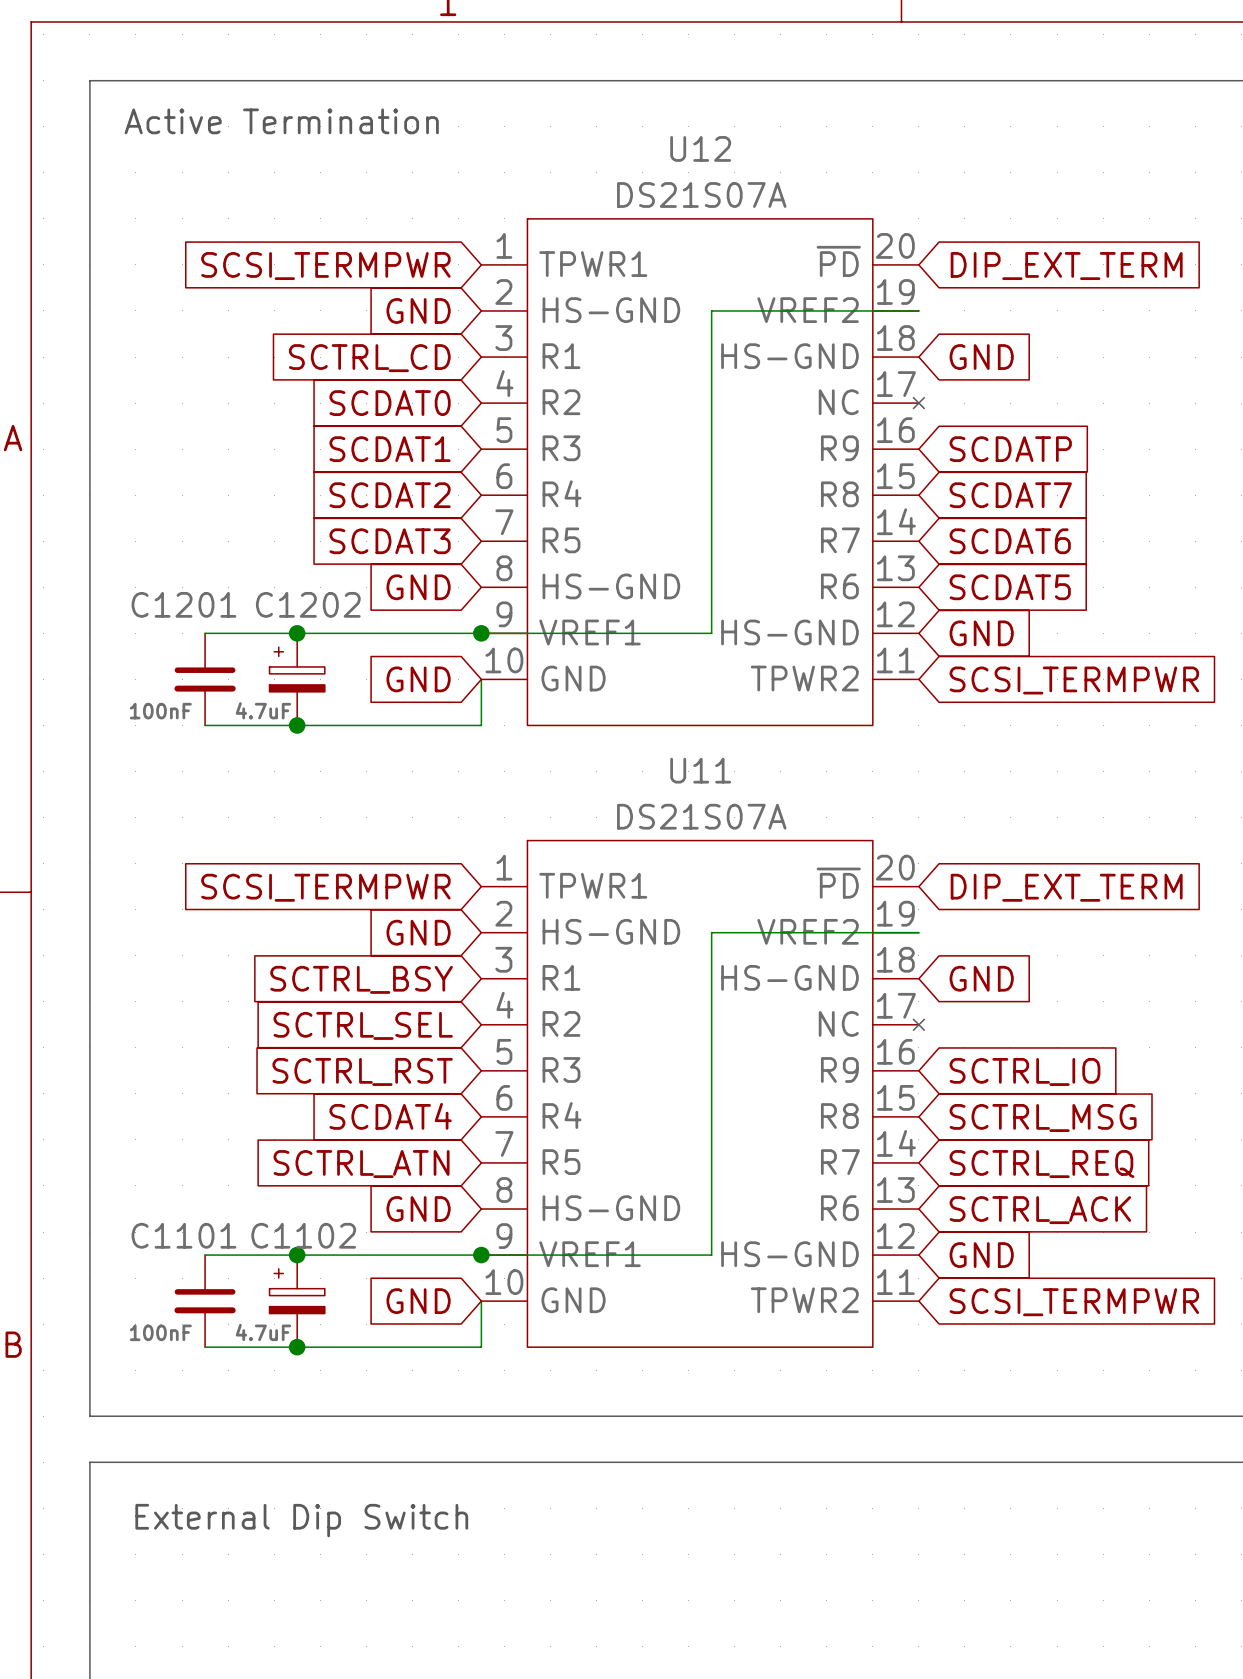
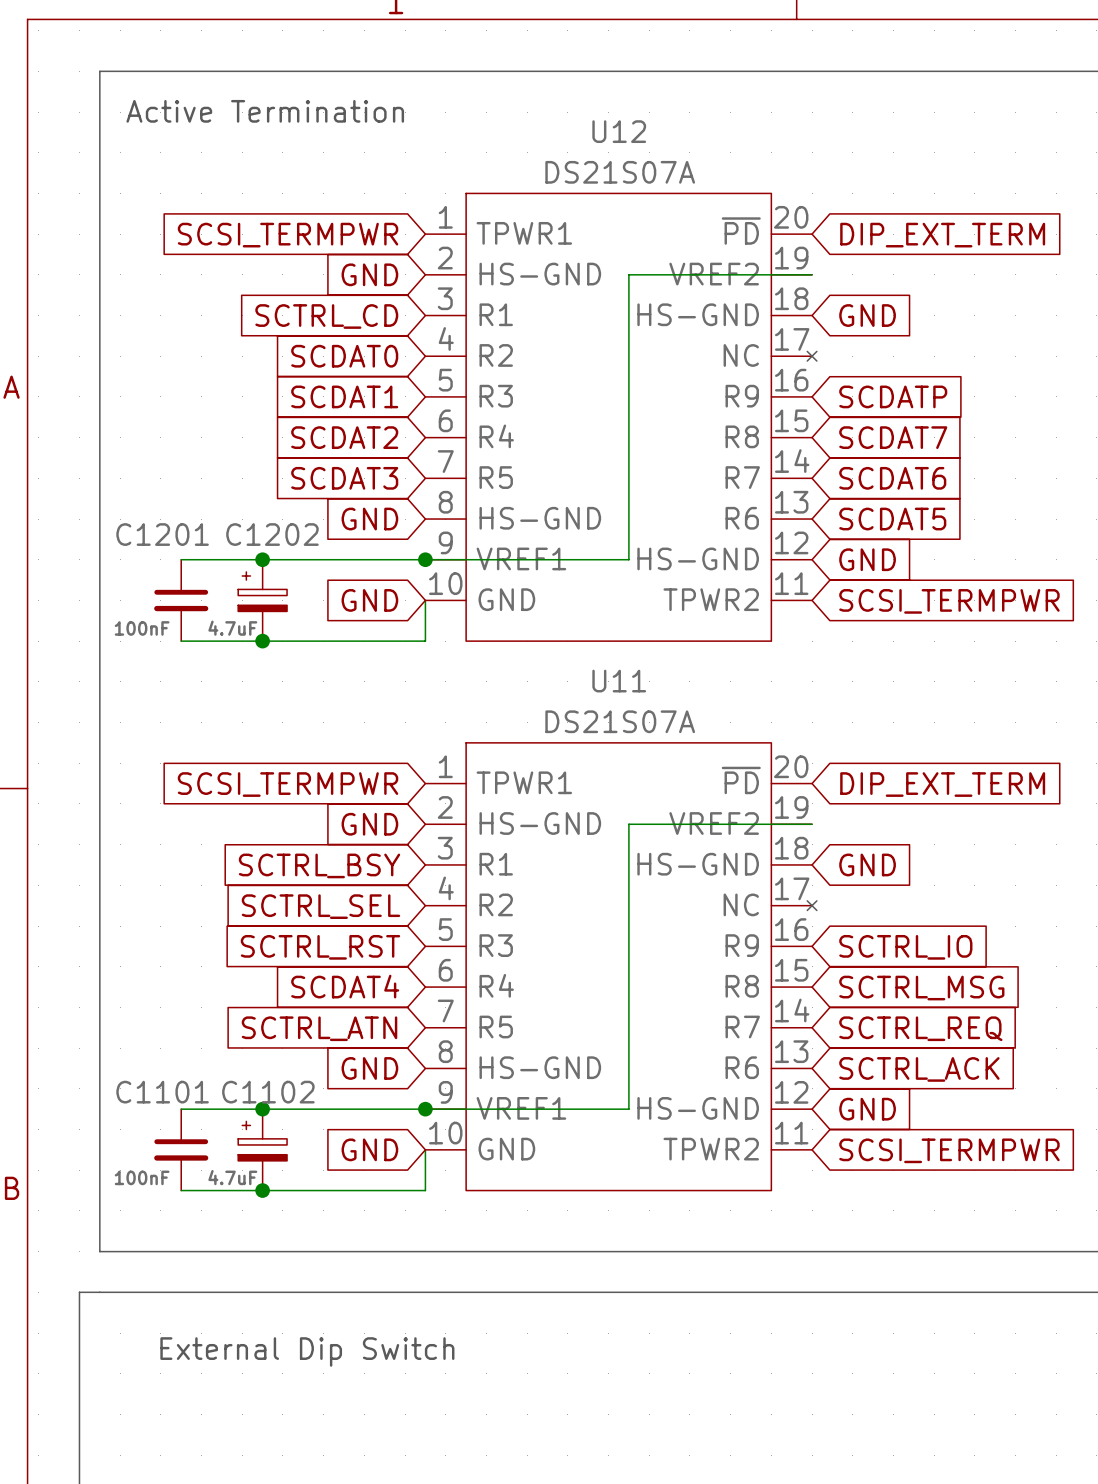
line: (112, 80) (89, 80) (89, 1416) (112, 1416) -> (99, 71) (99, 1251)
text position: Active Termination (281, 121) -> Active Termination (265, 111)
text position: External Dip Switch (301, 1520) -> External Dip Switch (307, 1351)

